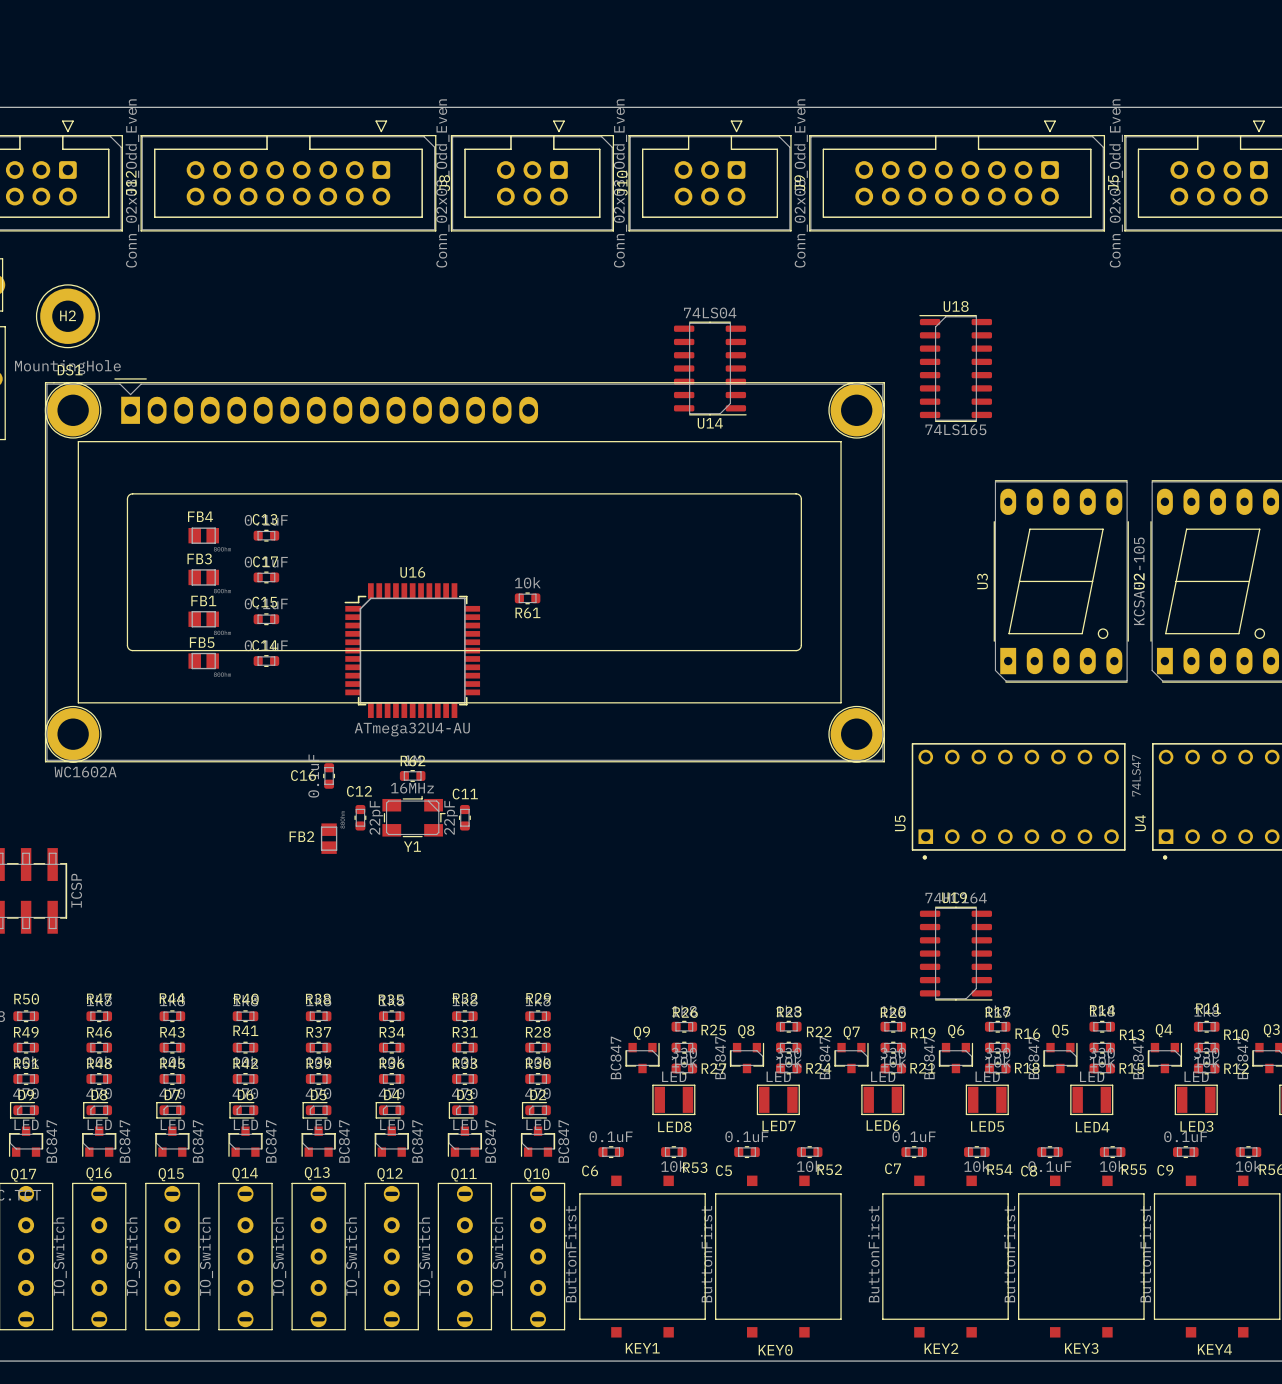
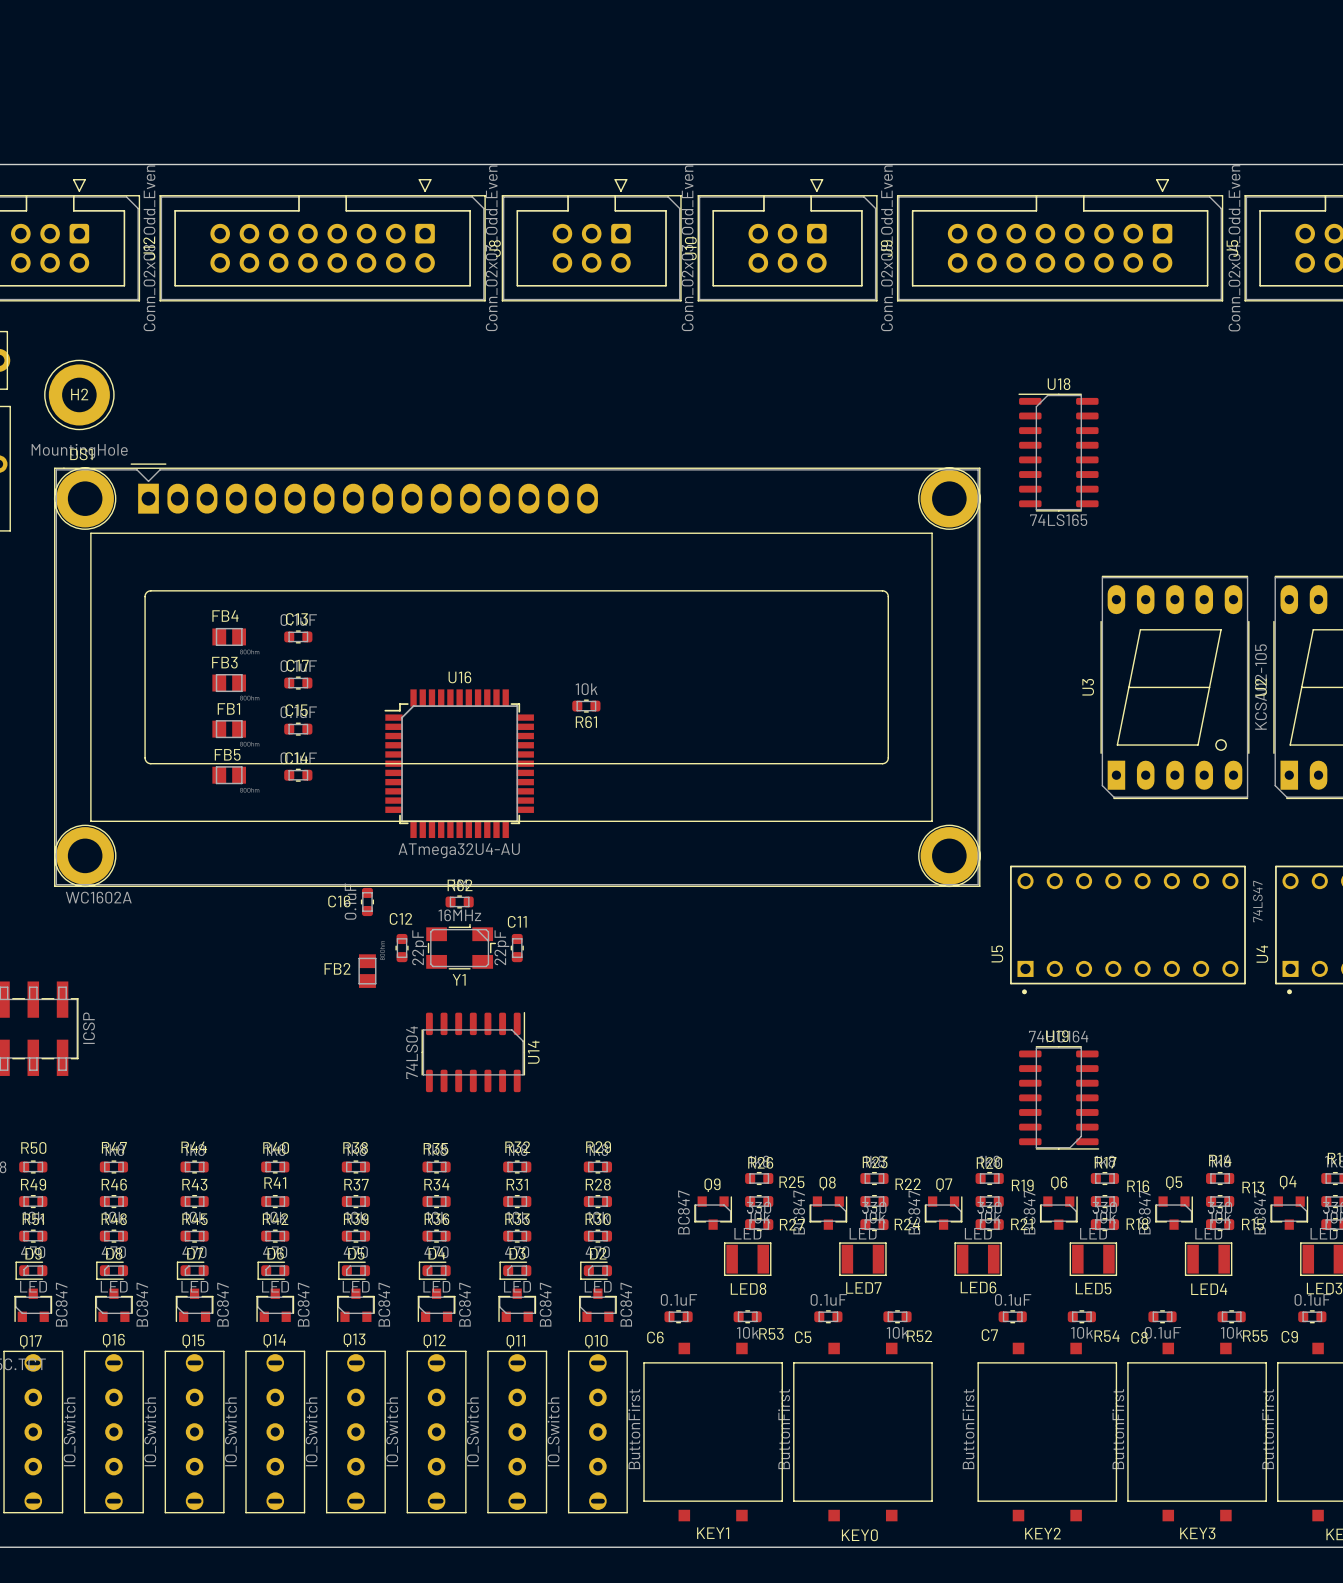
U14 rotation: 0° (710, 368) -> 90° counterclockwise (473, 1052)
U14 position: (710, 368) -> (473, 1052)

